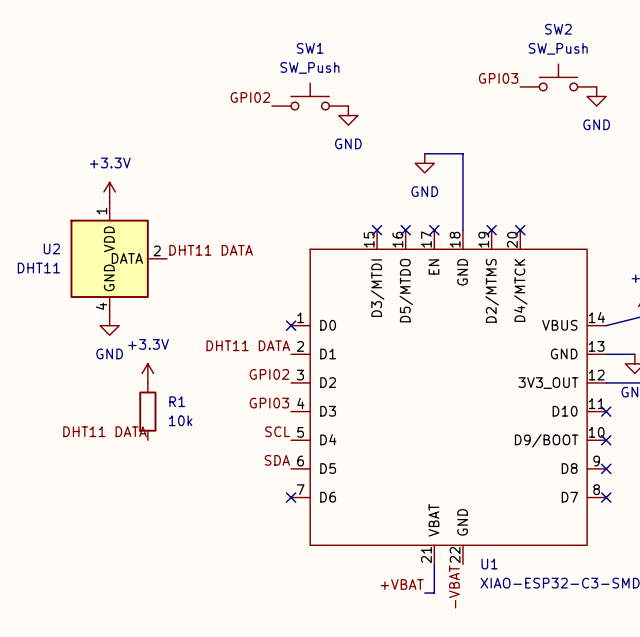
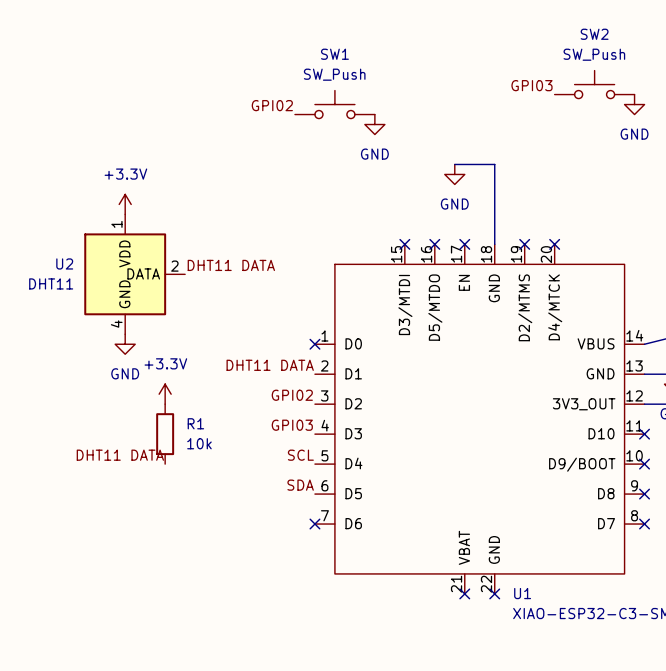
wire: (434, 564) (434, 593) (424, 593) -> none
no-connect mark: none -> (464, 593)
no-connect mark: none -> (494, 593)
label: +VBAT (402, 584) -> none
label: -VBAT (454, 586) -> none

